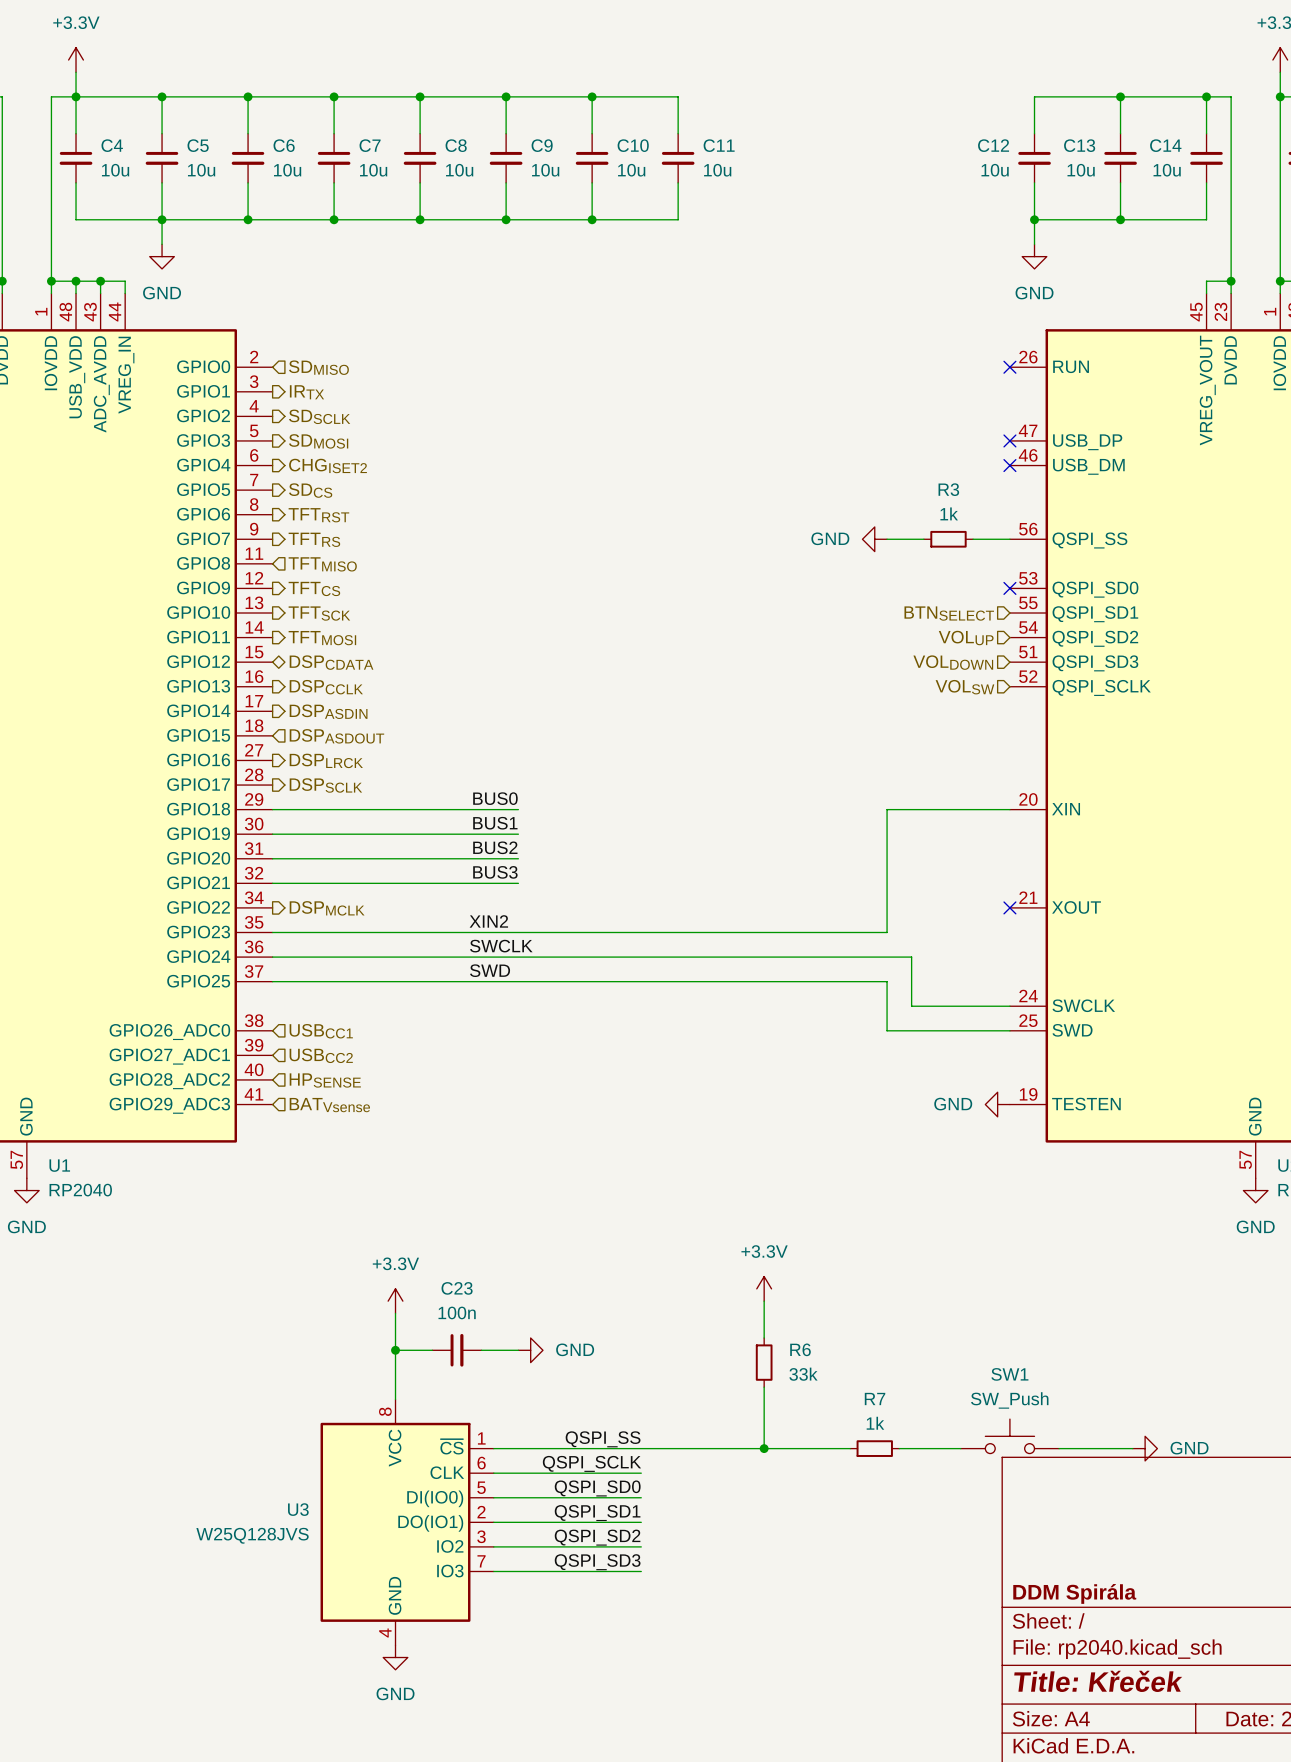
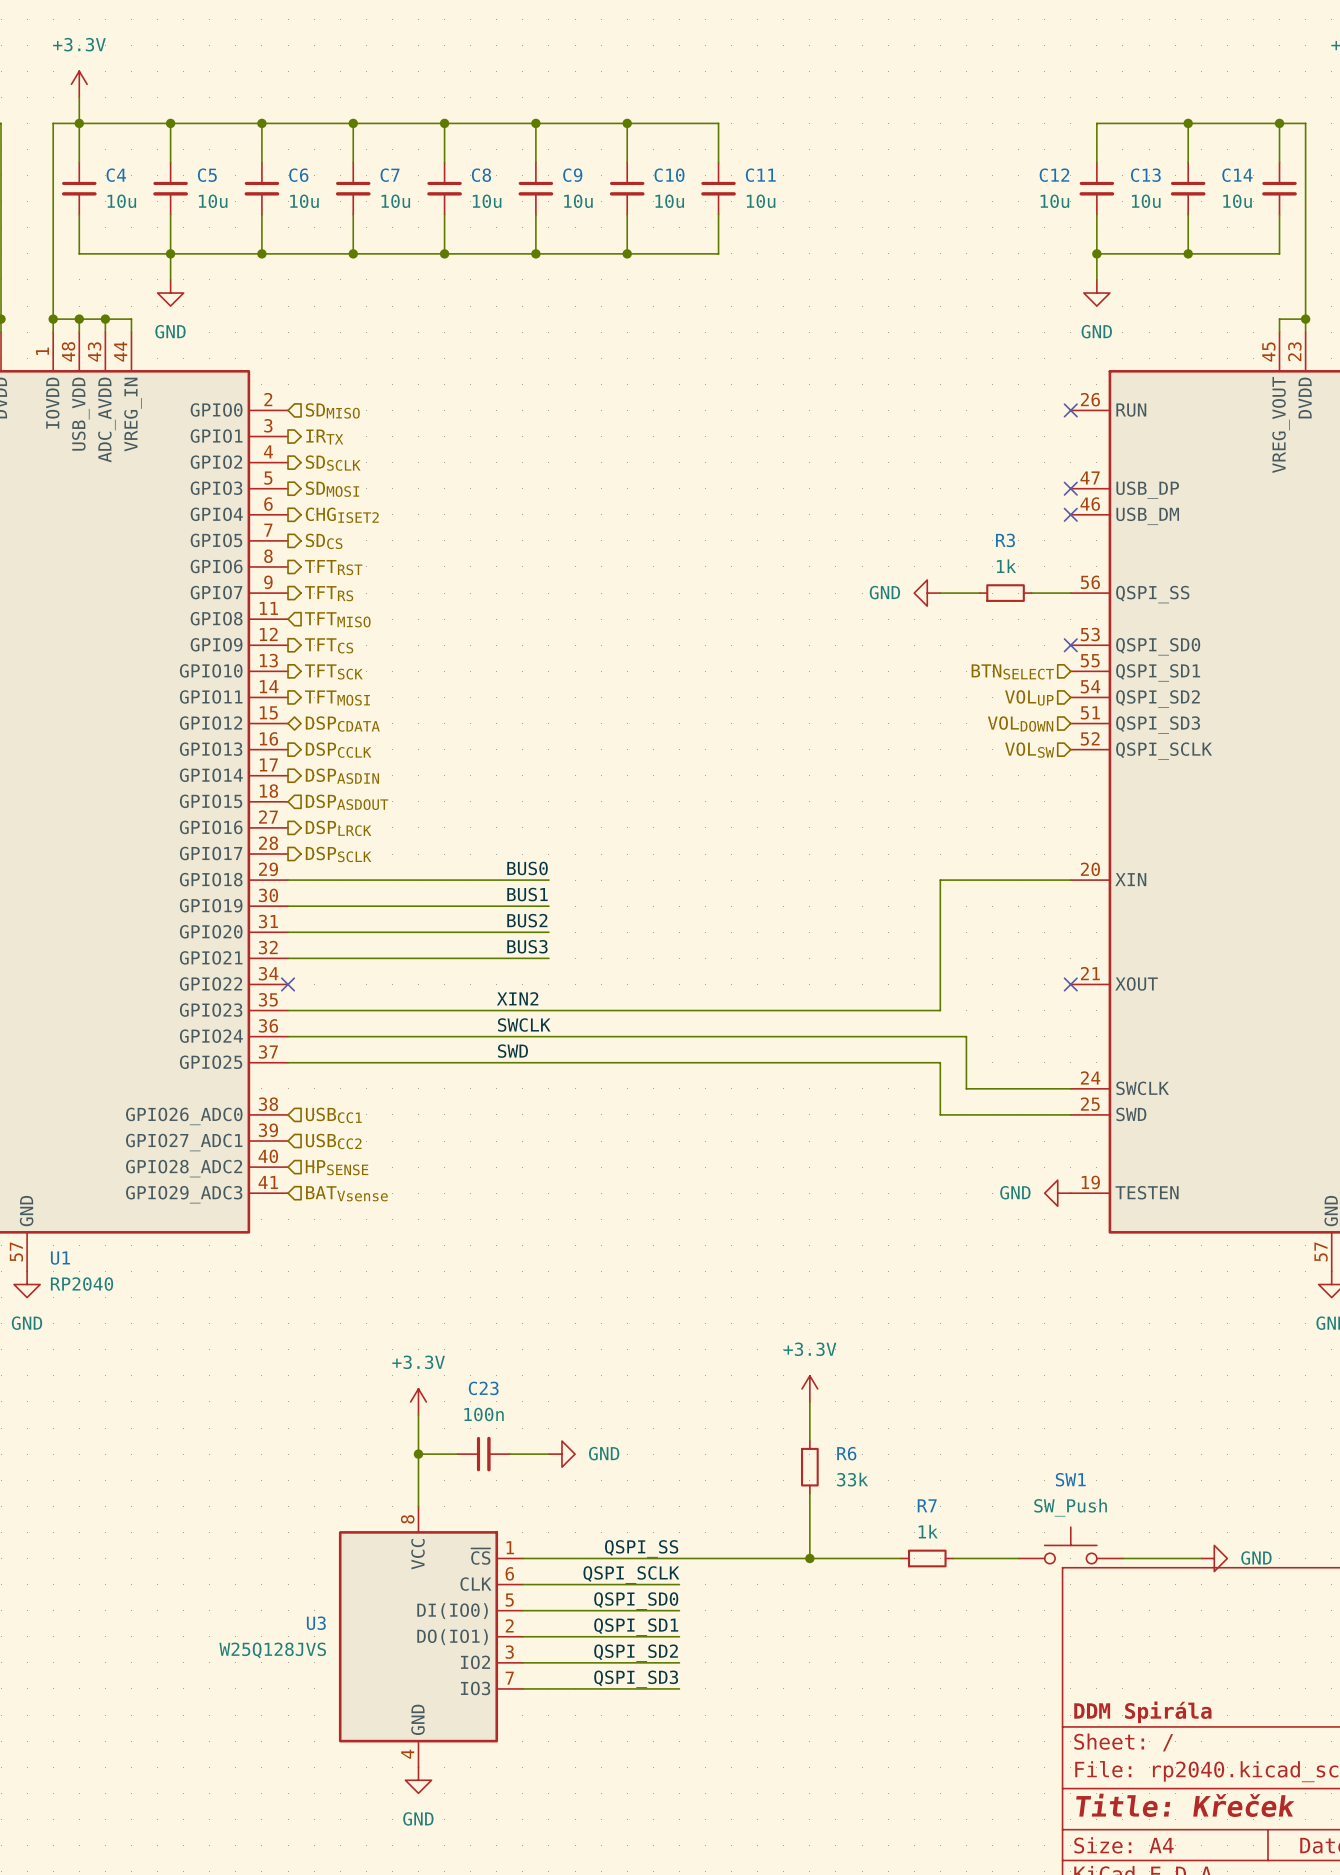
no-connect mark: none -> (288, 984)
hierarchical label: DSPMCLK (327, 908) -> none

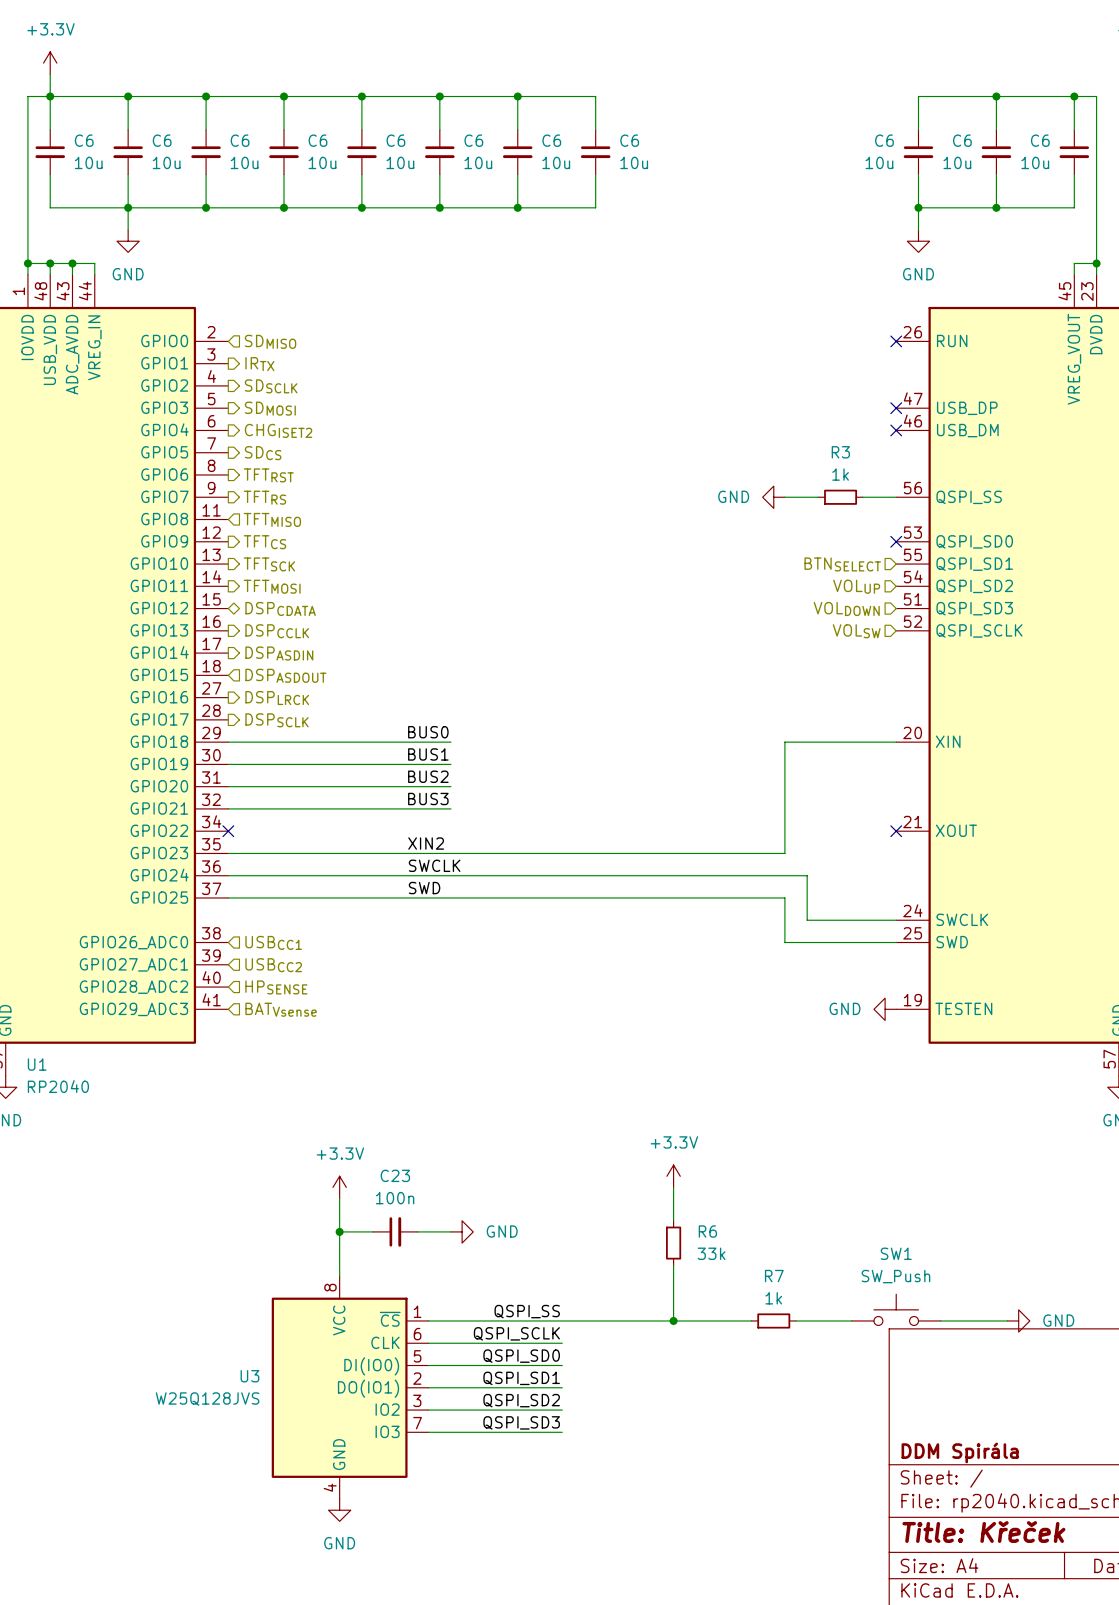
C4 name: C4 (116, 175) -> C6 (84, 140)
C5 name: C5 (207, 175) -> C6 (162, 140)
C7 name: C7 (390, 175) -> C6 (317, 140)
C8 name: C8 (481, 175) -> C6 (395, 140)
C9 name: C9 (572, 175) -> C6 (473, 140)
C10 name: C10 (669, 175) -> C6 (551, 140)
C11 name: C11 (760, 175) -> C6 (629, 140)
C12 name: C12 (1054, 175) -> C6 (884, 140)
C13 name: C13 (1145, 175) -> C6 (962, 140)
C14 name: C14 (1237, 175) -> C6 (1040, 140)

